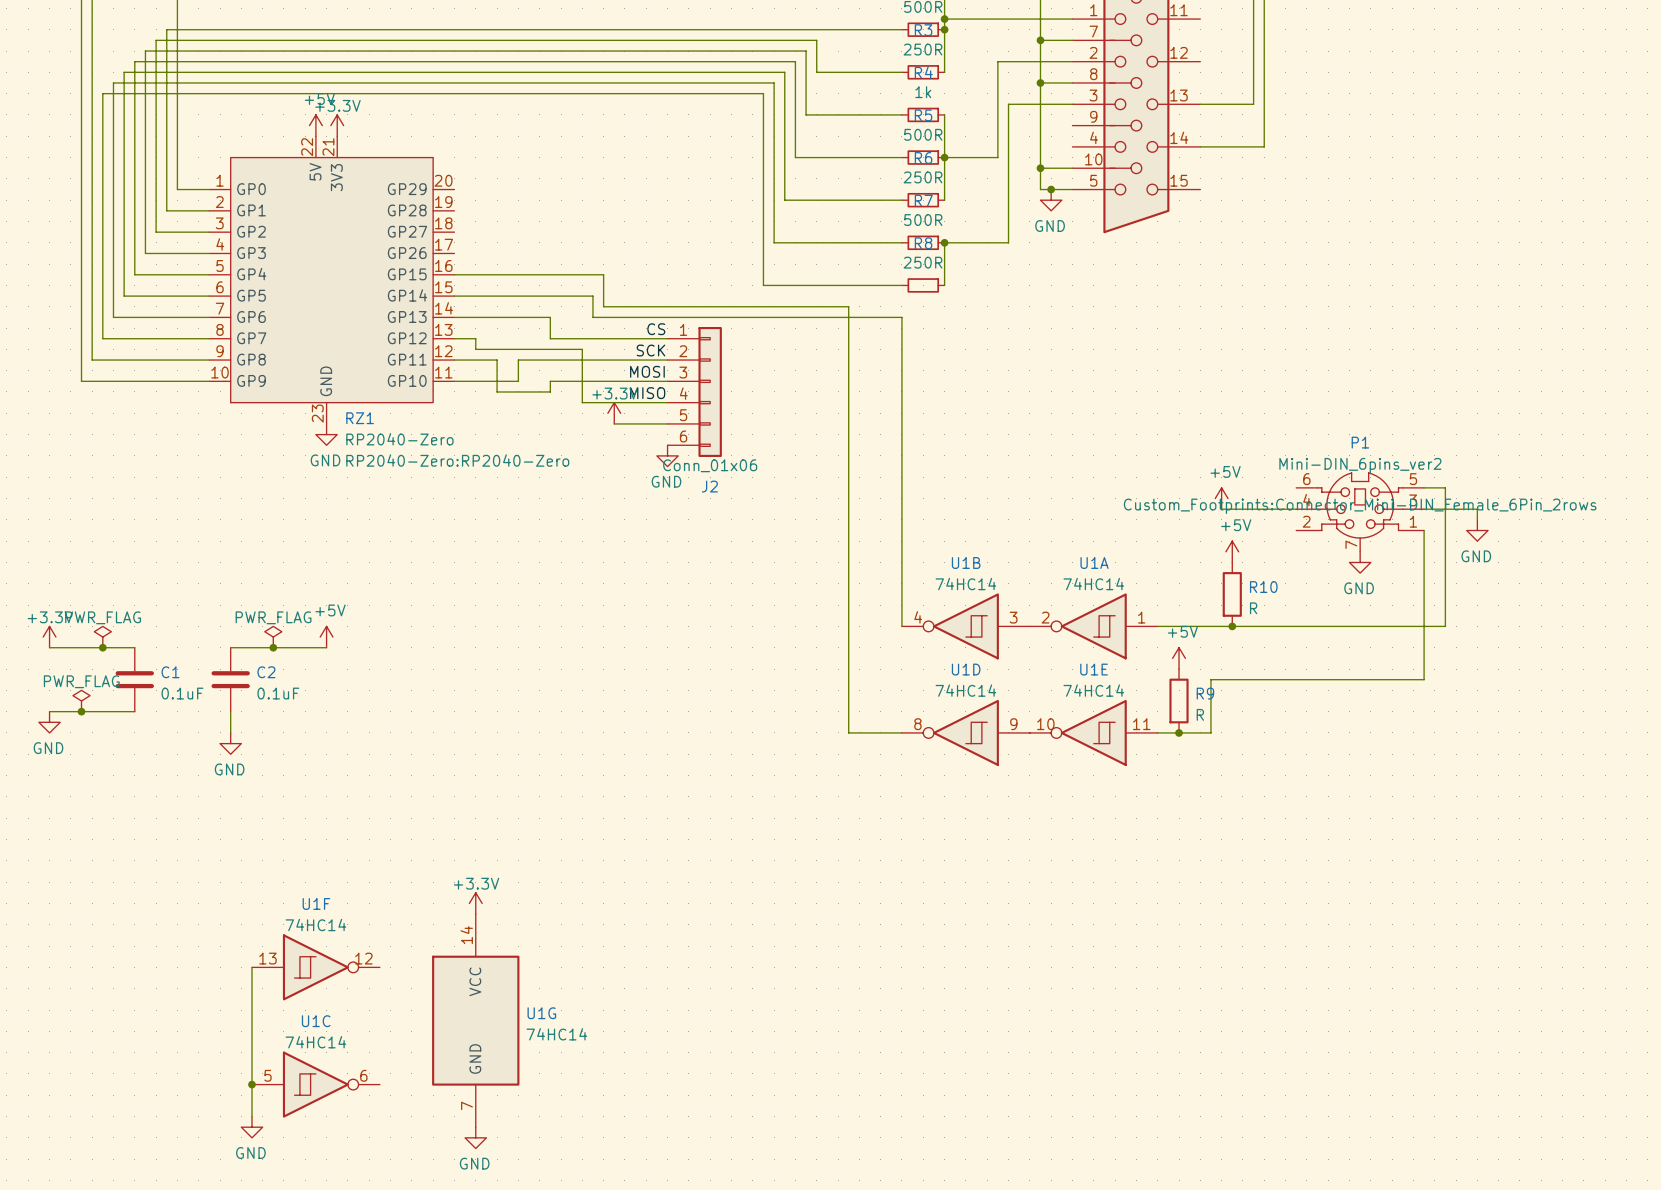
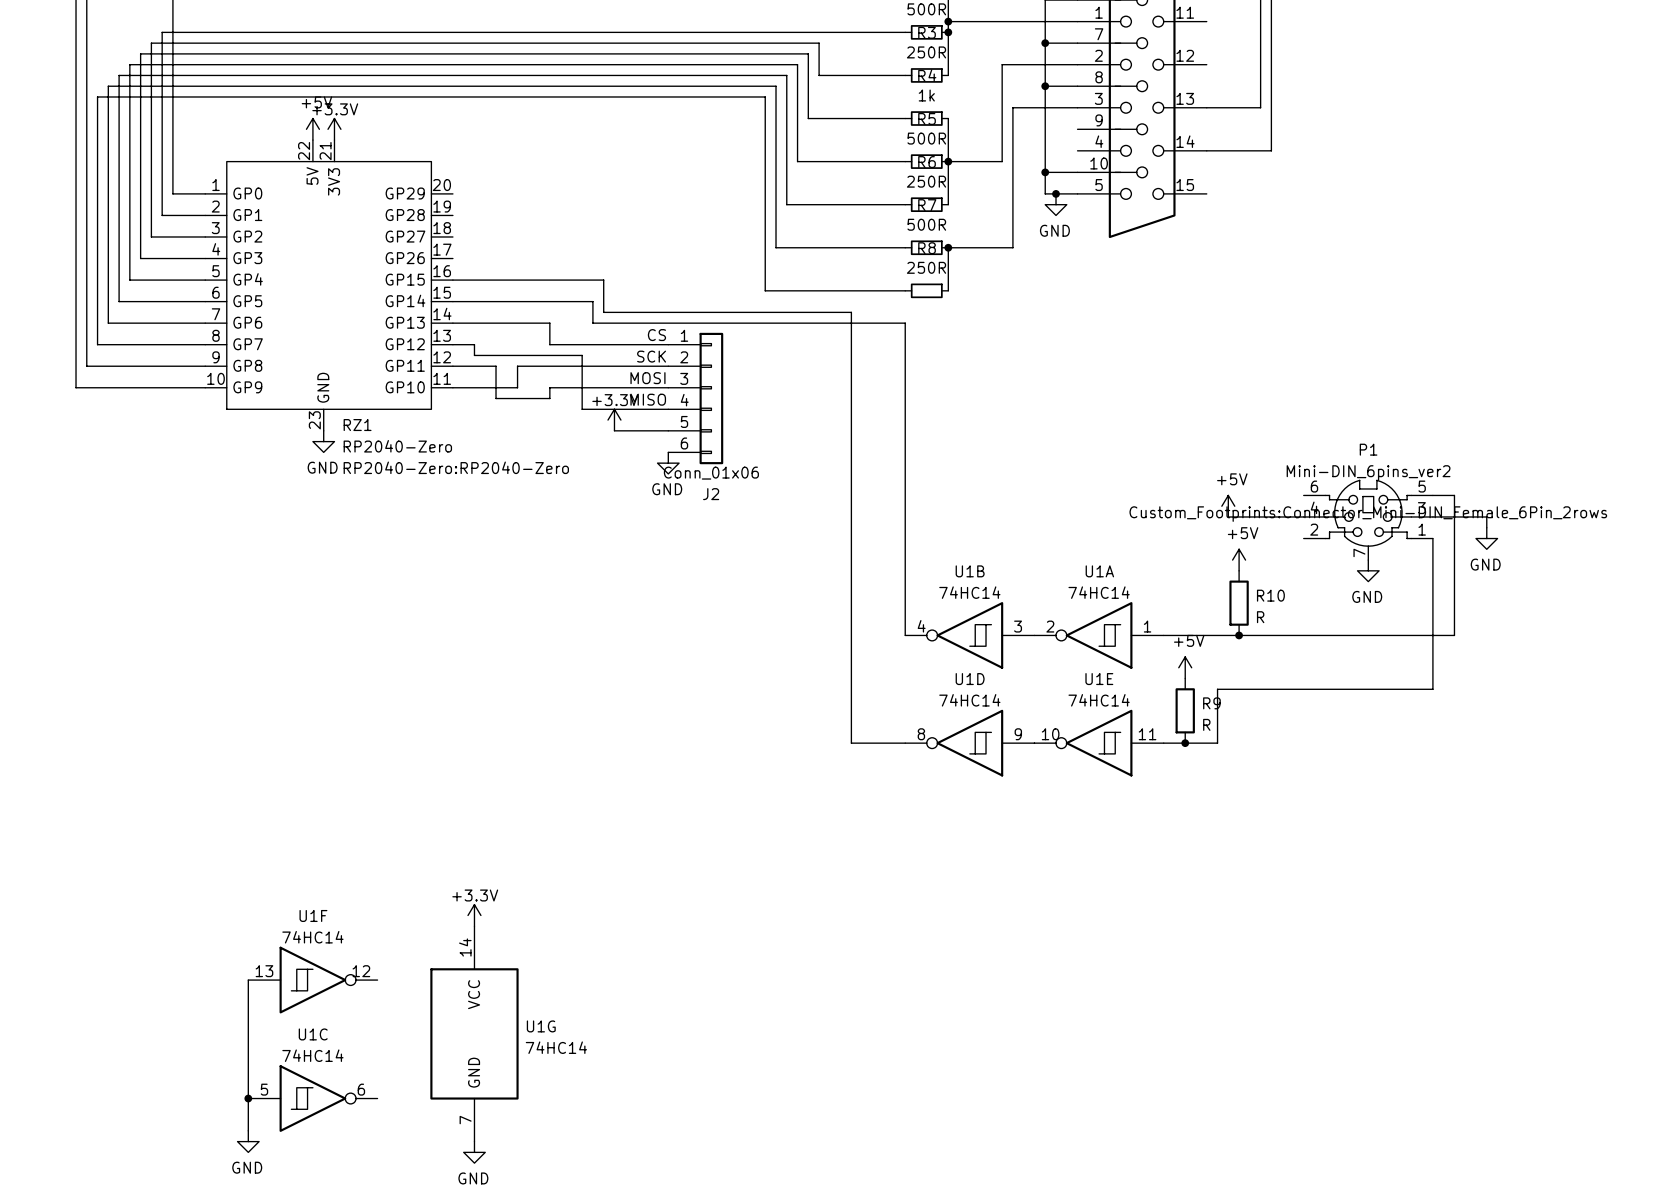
power symbol: +3.3V (49, 637) -> none
power symbol: PWR_FLAG (102, 637) -> none
power symbol: PWR_FLAG (273, 637) -> none
power symbol: +5V (326, 637) -> none
wire: (49, 647) (134, 647) -> none
junction: (102, 647) -> none
wire: (230, 647) (326, 647) -> none
junction: (273, 647) -> none
C1: 0.1uF (134, 679) -> none
C2: 0.1uF (230, 679) -> none
power symbol: PWR_FLAG (81, 700) -> none
wire: (49, 711) (134, 711) -> none
junction: (81, 711) -> none
wire: (230, 711) (230, 732) -> none
power symbol: GND (49, 722) -> none
power symbol: GND (230, 743) -> none

